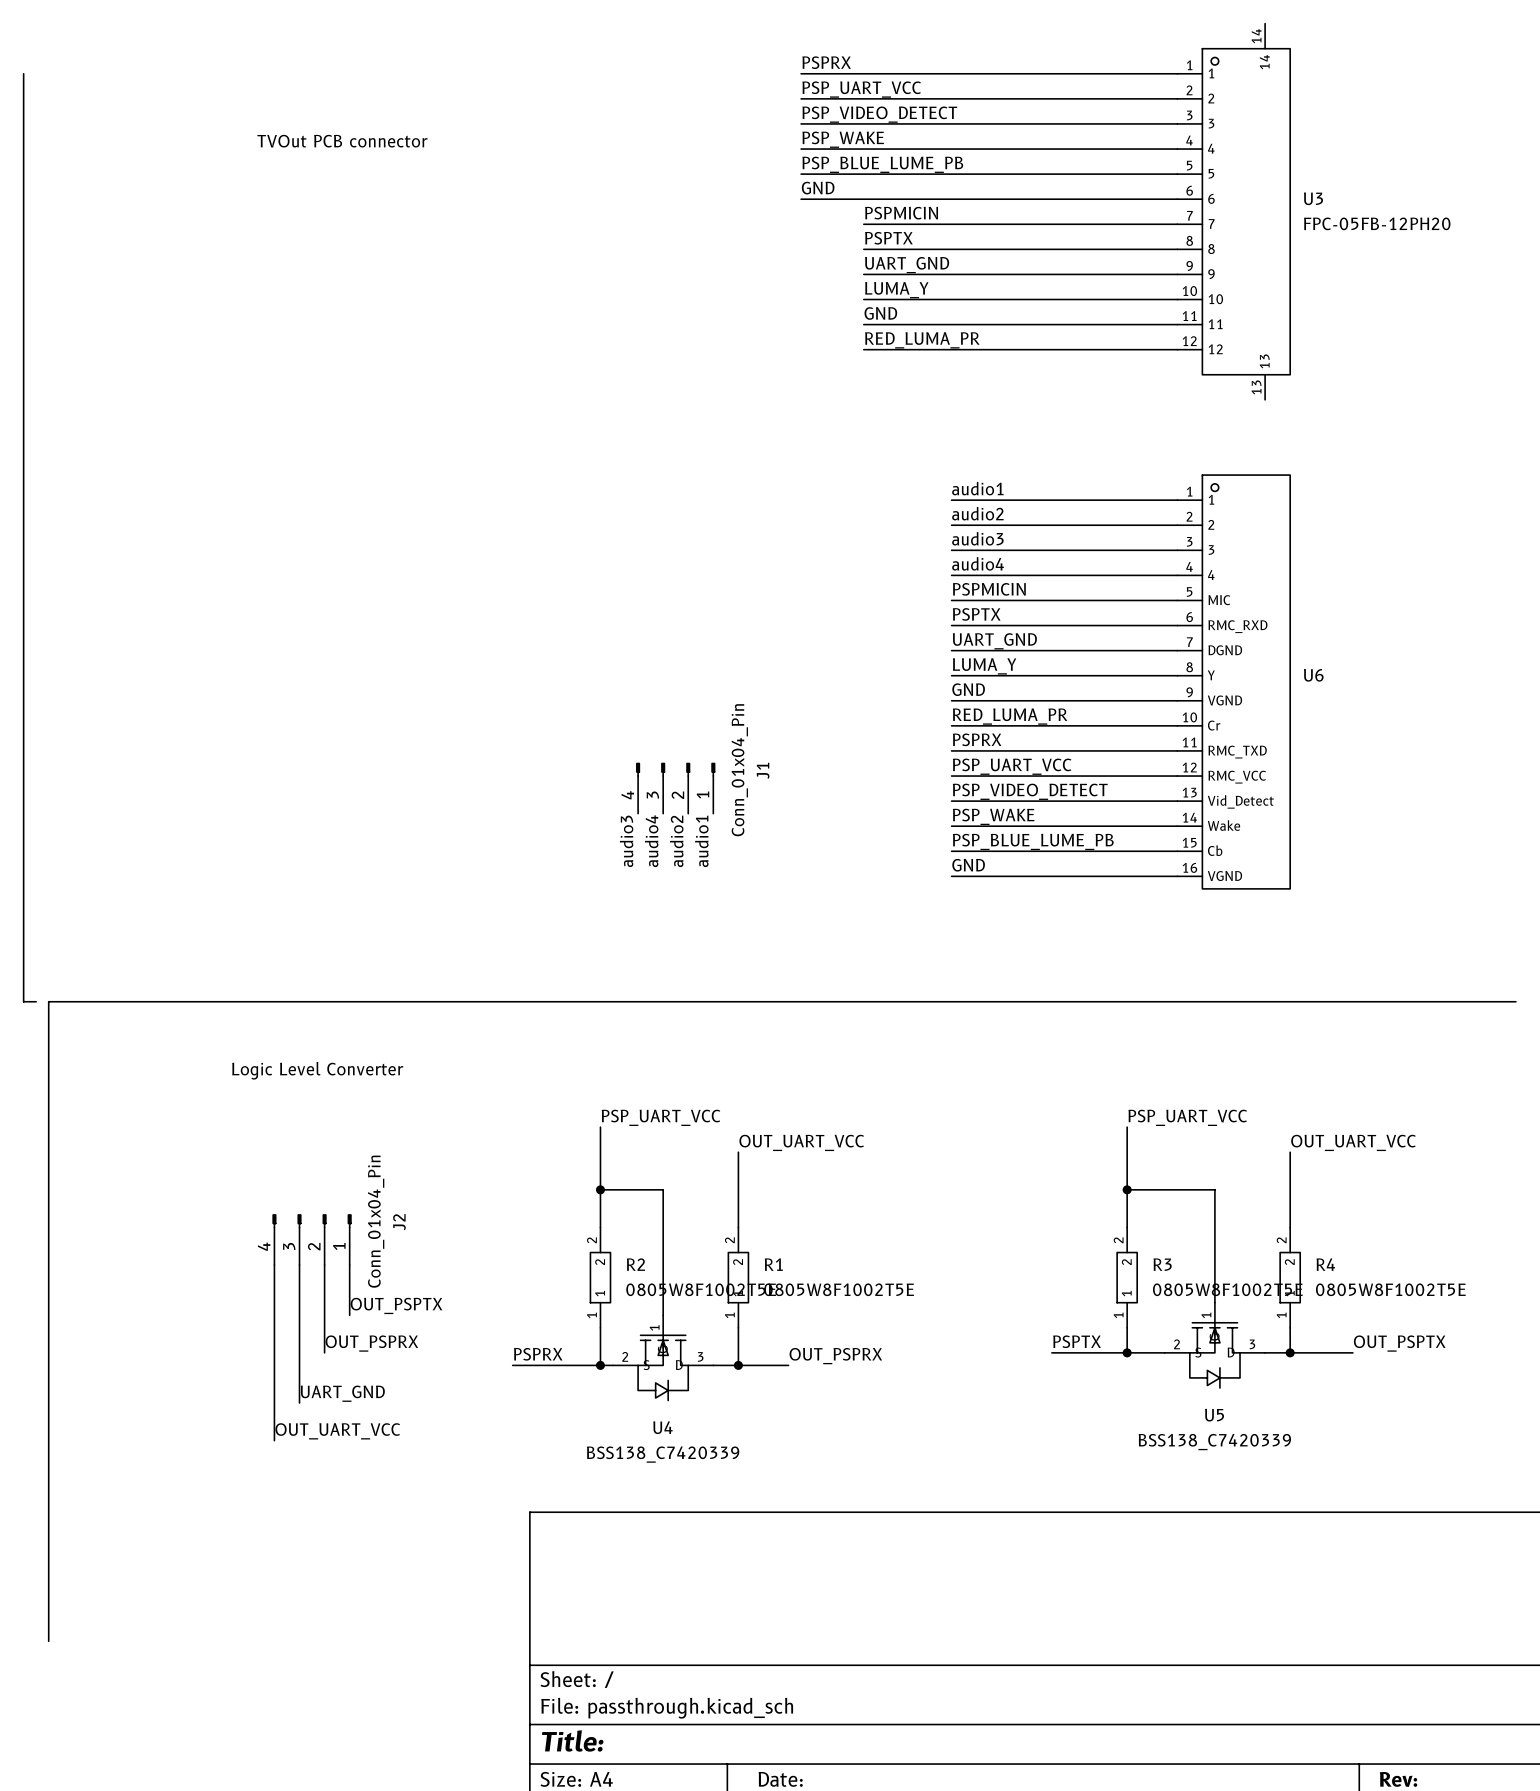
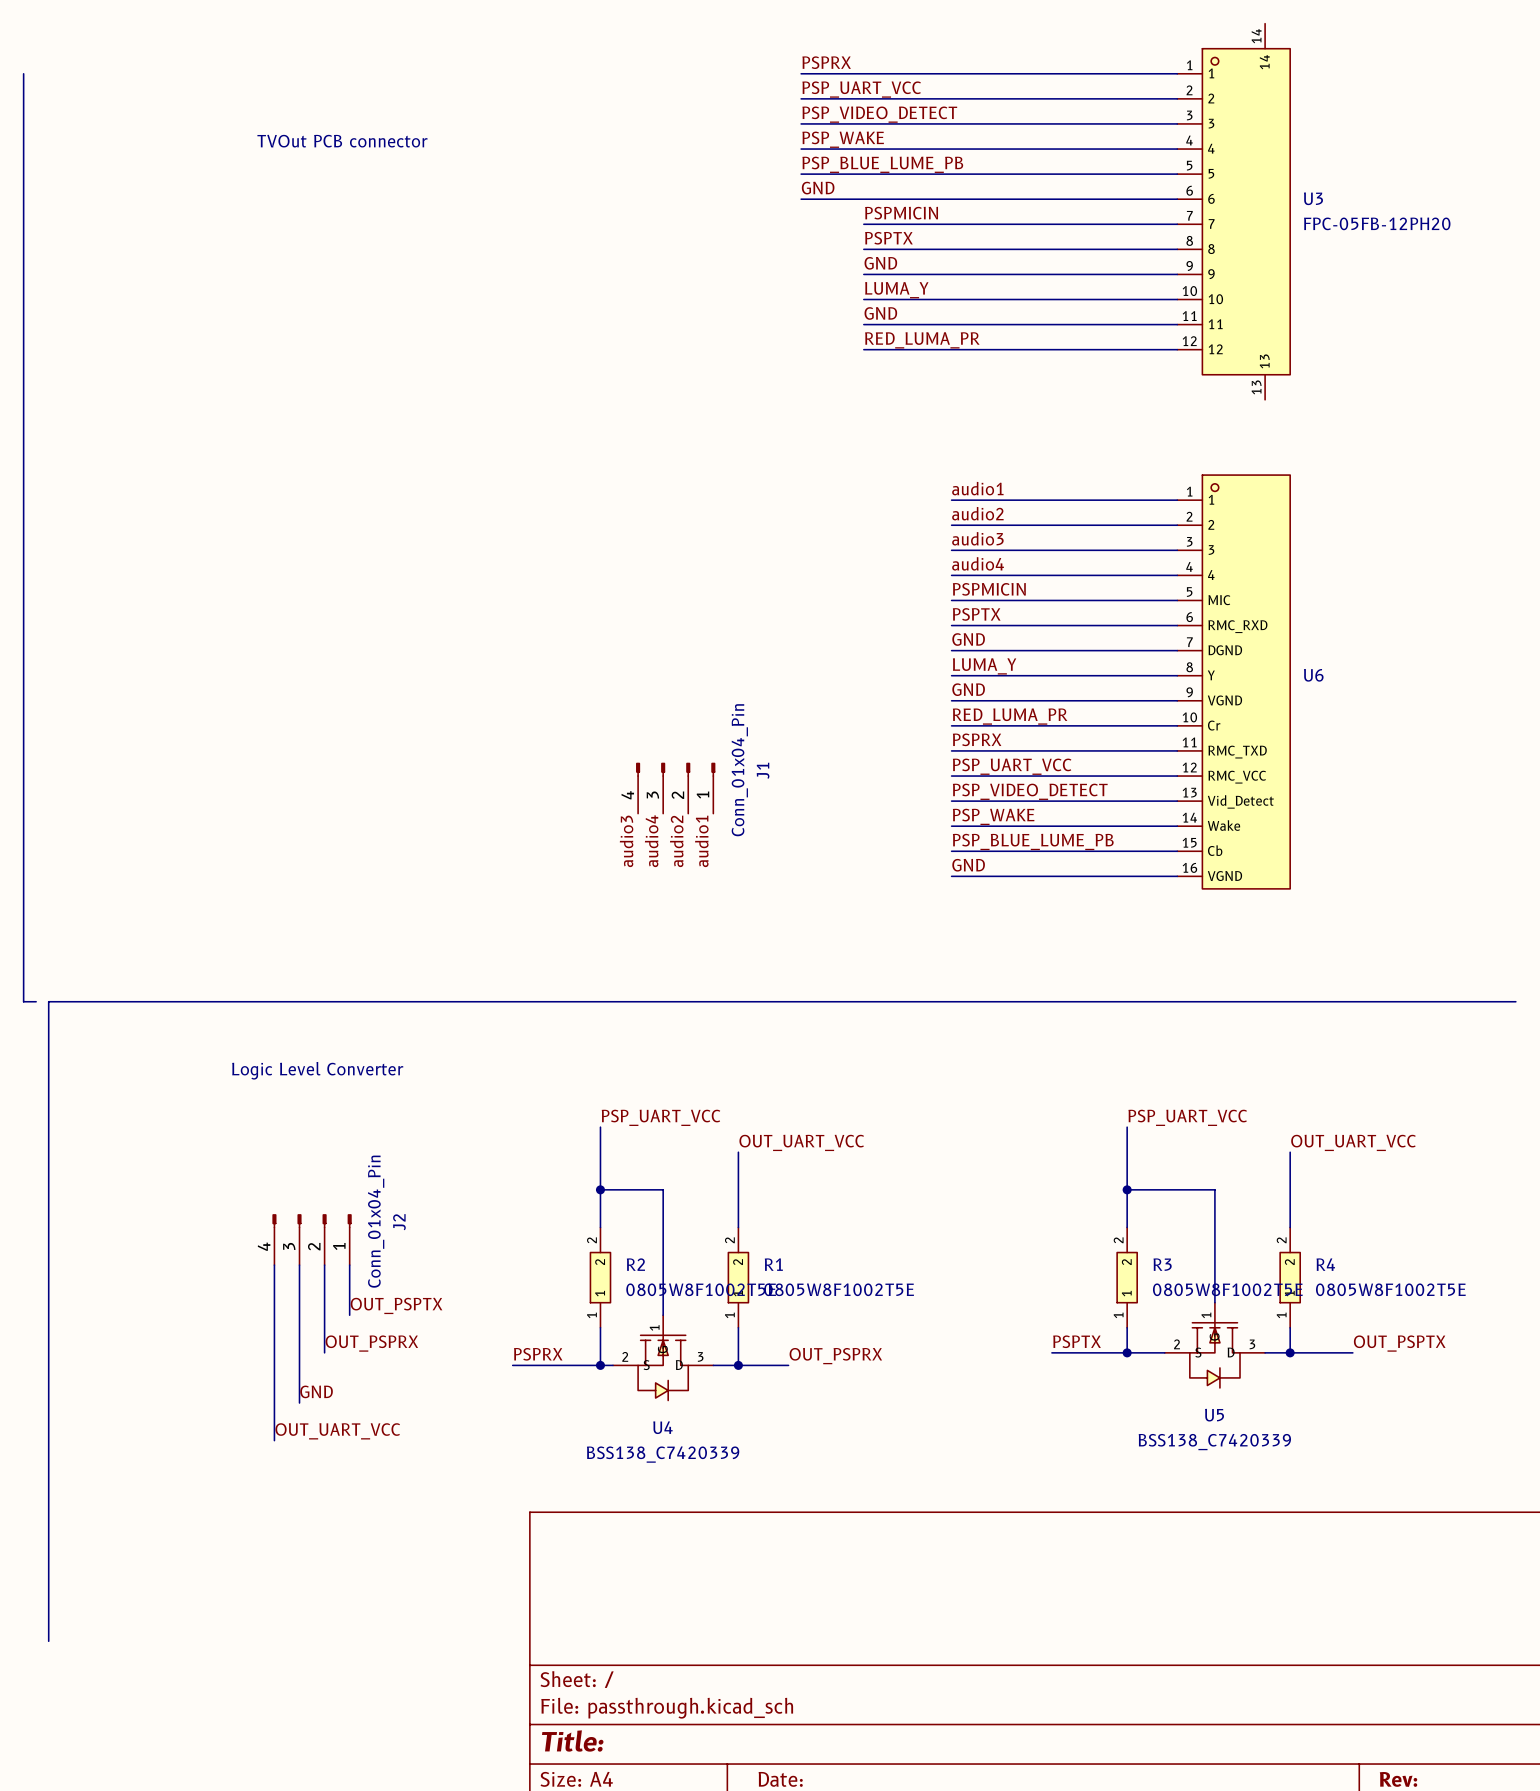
label: UART_GND (907, 265) -> GND (880, 263)
label: UART_GND (994, 641) -> GND (968, 639)
label: UART_GND (342, 1393) -> GND (316, 1391)

